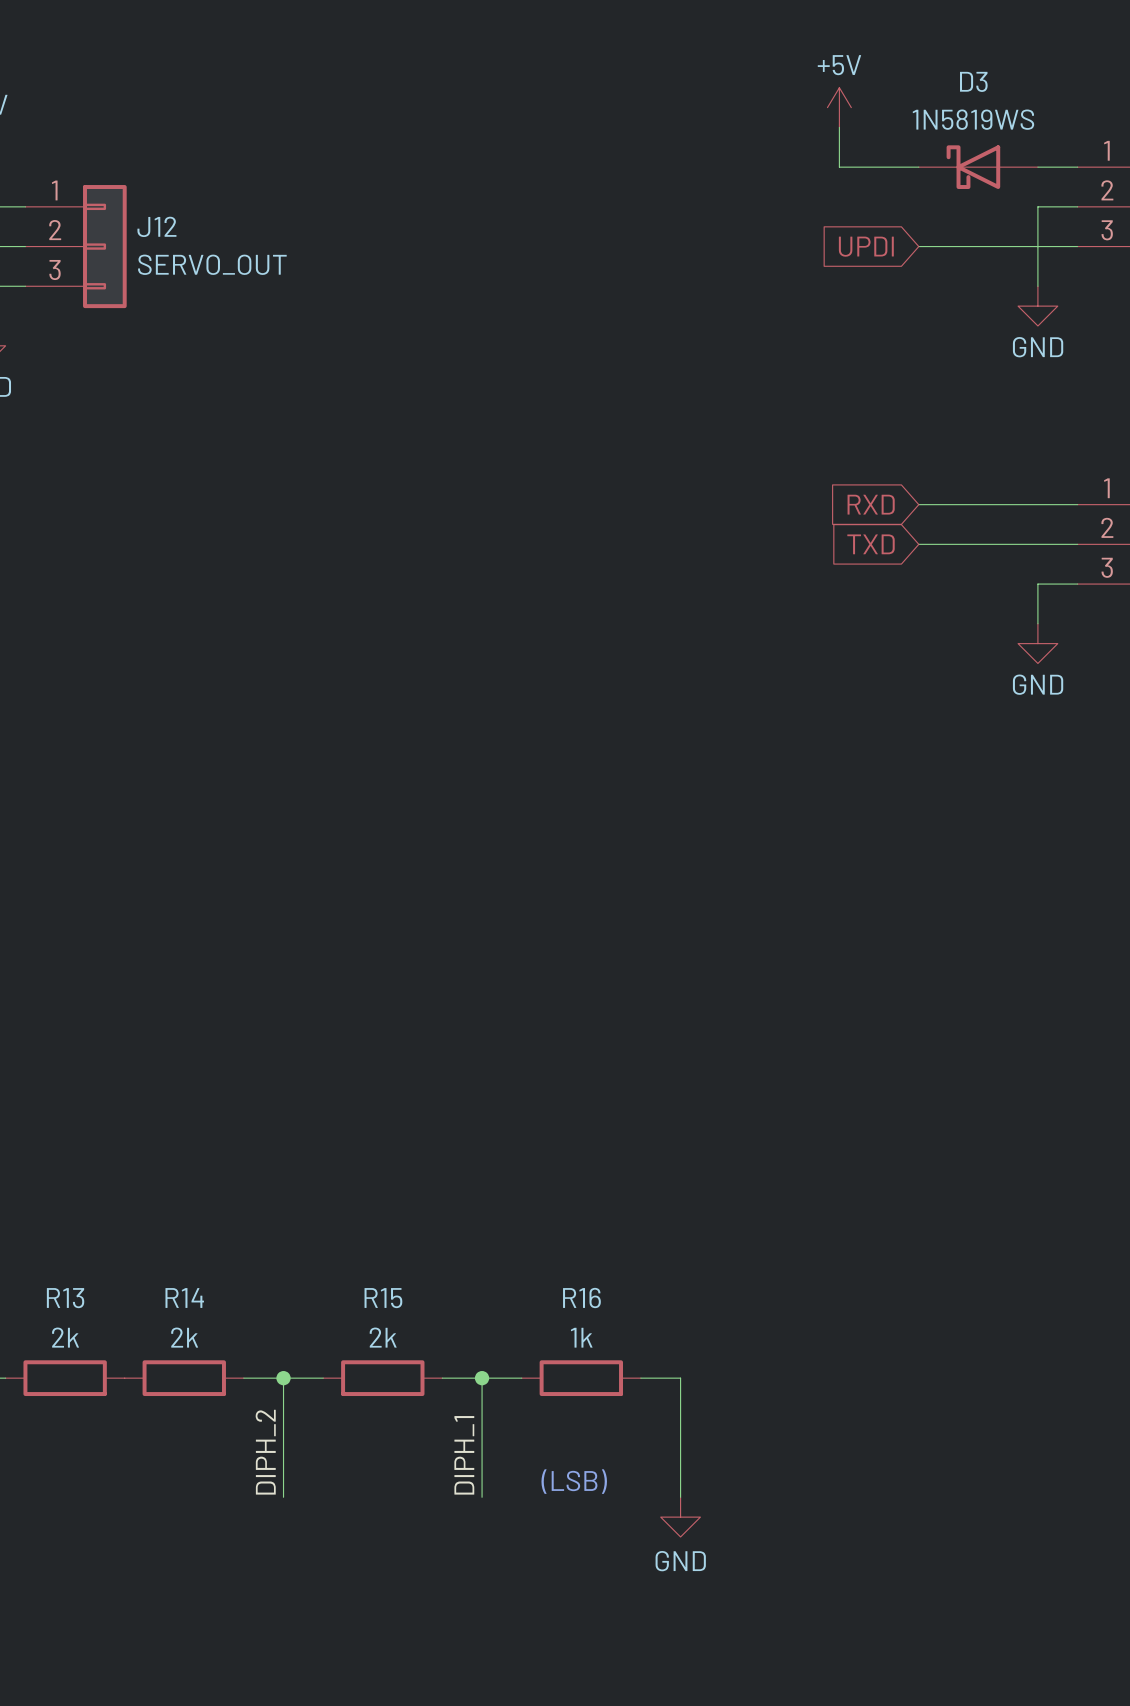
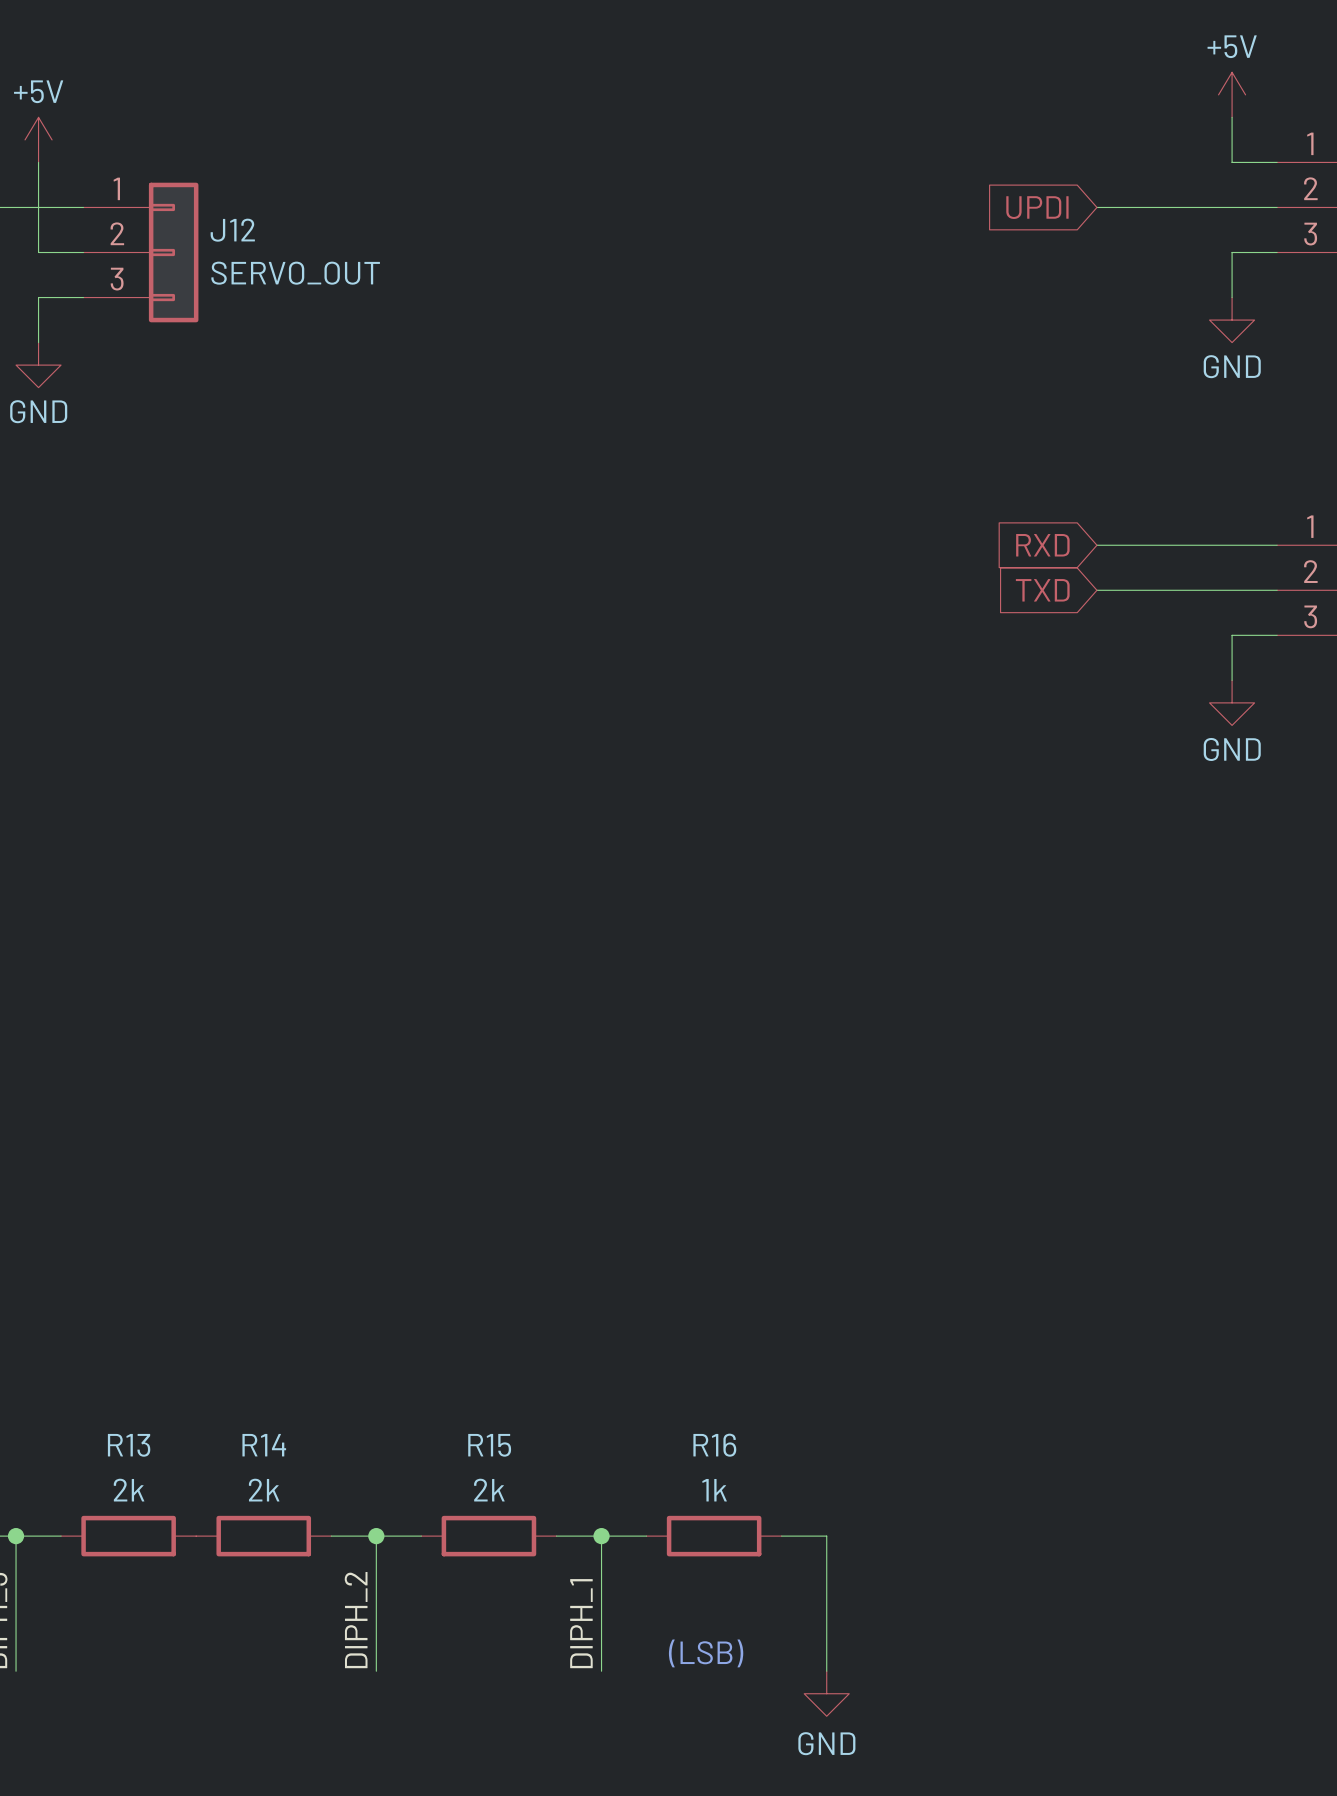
power symbol position: +5V (839, 107) -> +5V (1232, 94)
wire: (839, 127) (839, 167) (918, 167) -> none
wire: none -> (1232, 117) (1232, 162)
D3: 1N5819WS (978, 167) -> none
wire: (1037, 206) (1037, 246) (918, 246) -> (1232, 207) (1096, 207)
global label position: UPDI (866, 246) -> UPDI (1037, 207)

